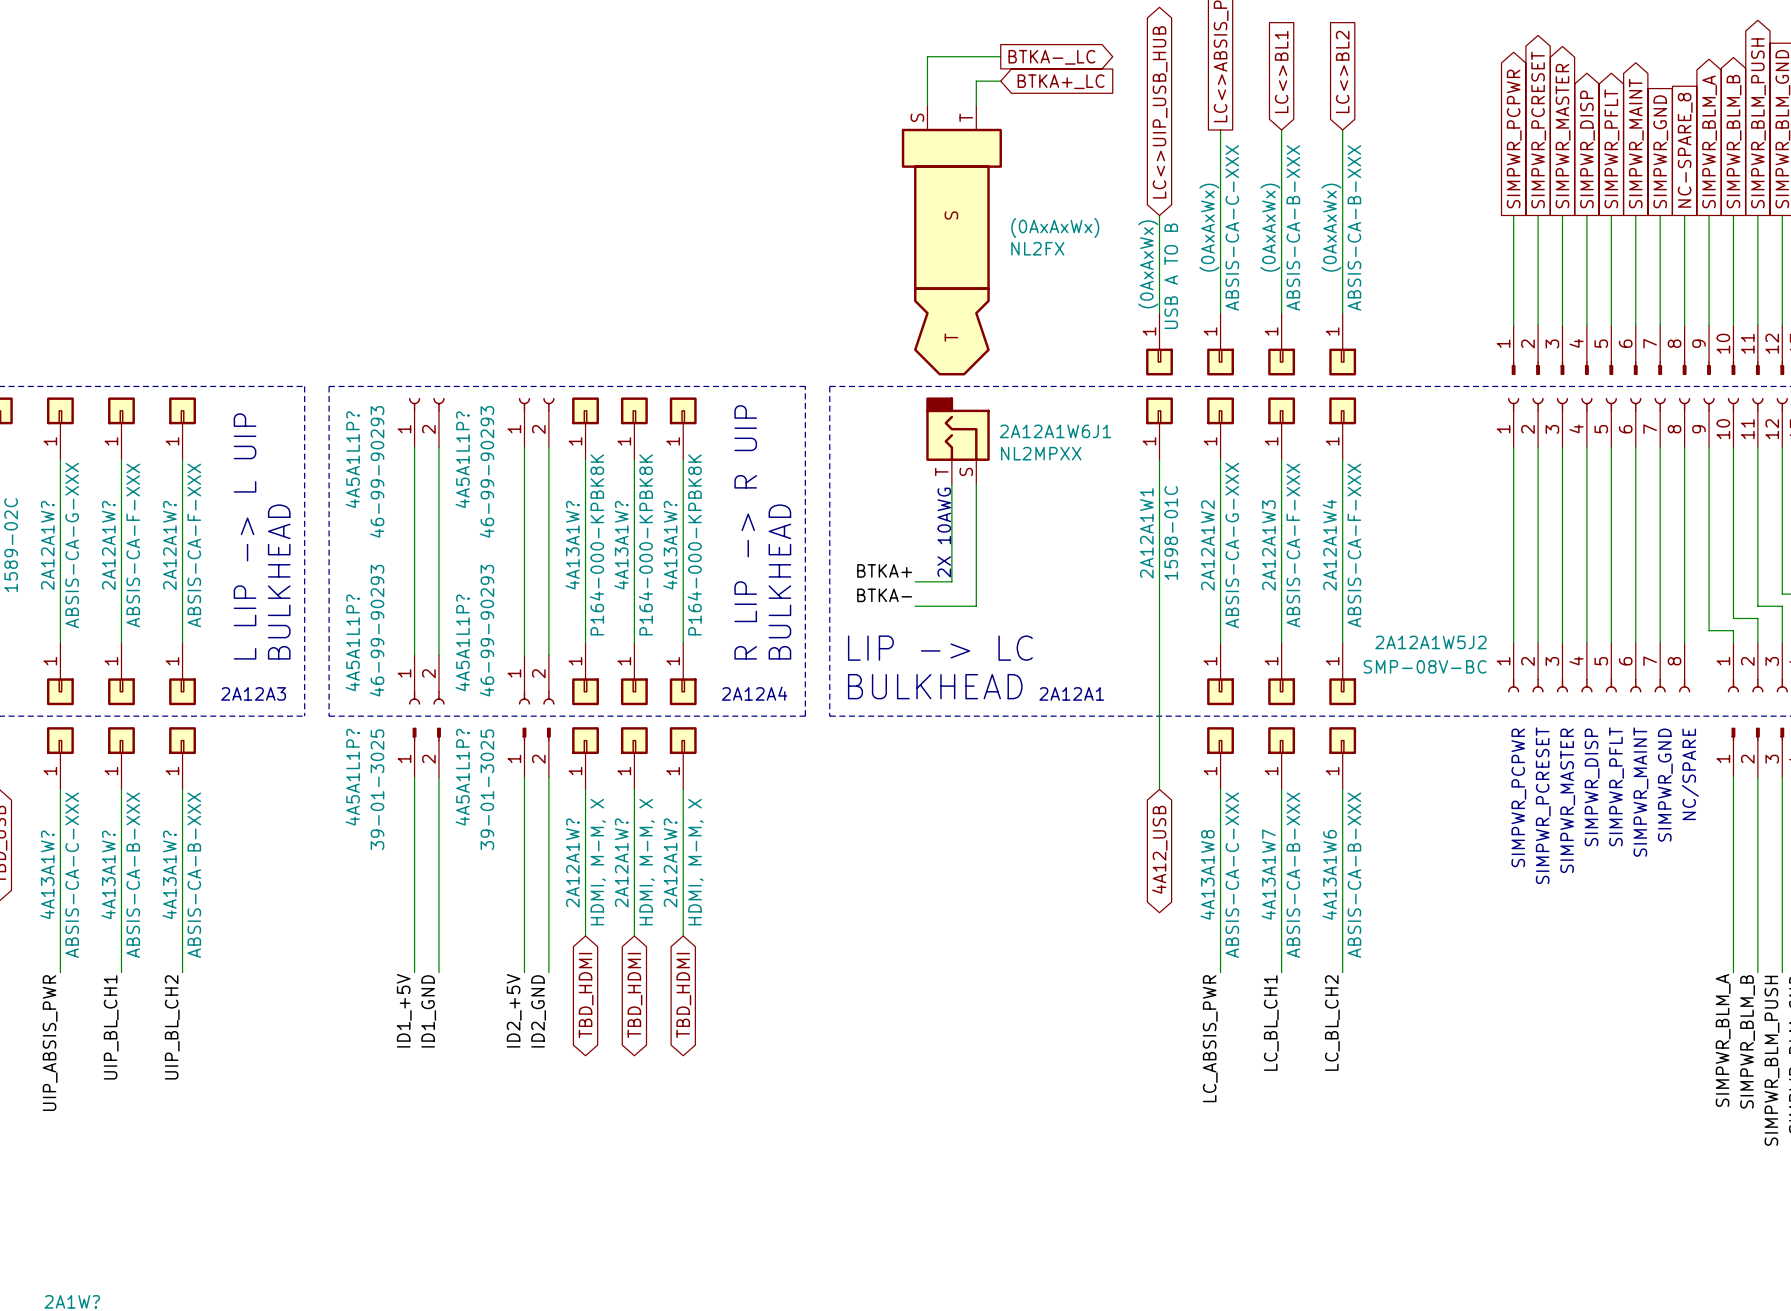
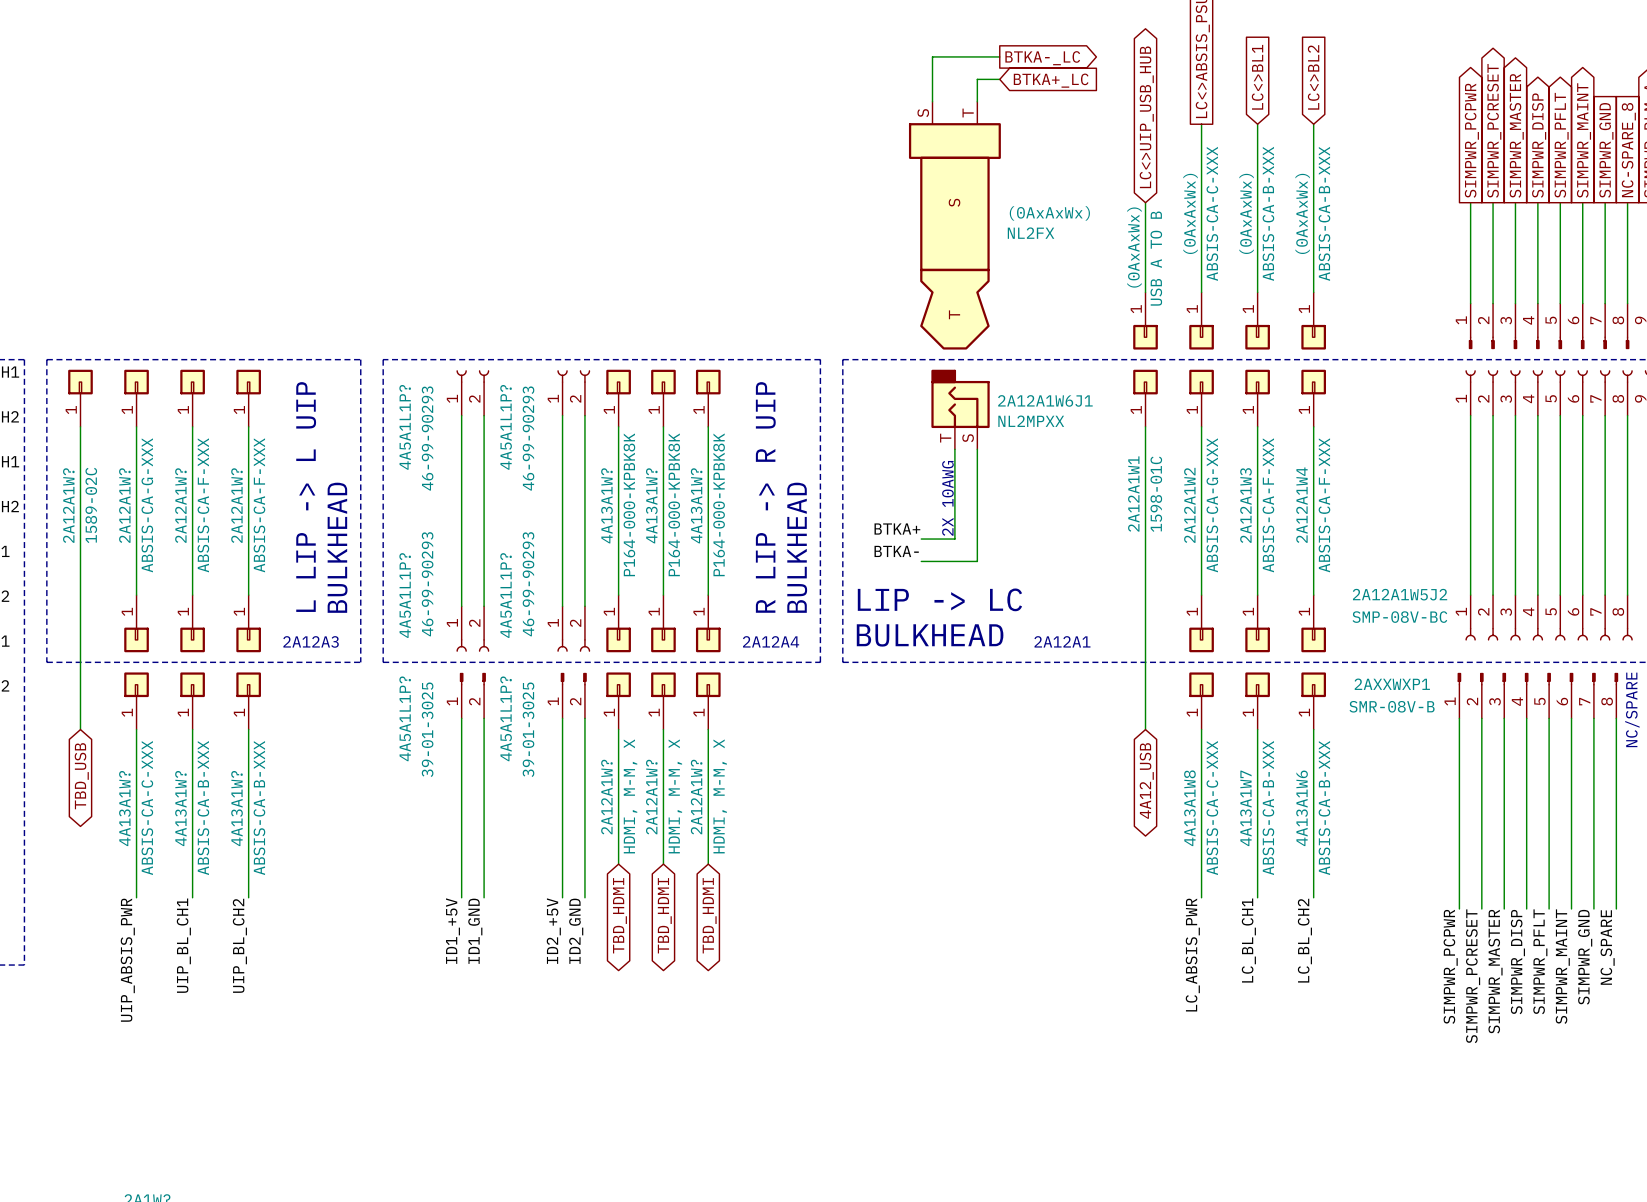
2AXXWXP1: none -> SMR-08V-B (1537, 695)
wire: none -> (1459, 718) (1459, 908)
wire: none -> (1481, 718) (1481, 908)
wire: none -> (1504, 718) (1504, 908)
wire: none -> (1526, 718) (1526, 908)
wire: none -> (1549, 718) (1549, 908)
wire: none -> (1571, 718) (1571, 908)
wire: none -> (1593, 718) (1593, 908)
wire: none -> (1616, 718) (1616, 908)
text: SIMPWR_GND (1665, 785) -> none
text: SIMPWR_PFLT (1616, 786) -> none
text: SIMPWR_DISP (1592, 787) -> none
text: SIMPWR_MAINT (1640, 792) -> none
text: SIMPWR_PCPWR (1518, 797) -> none
text: SIMPWR_MASTER (1567, 800) -> none
text: SIMPWR_PCRESET (1543, 805) -> none
label: none -> NC_SPARE (1607, 947)
label: none -> SIMPWR_GND (1585, 957)
label: none -> SIMPWR_PFLT (1540, 961)
label: none -> SIMPWR_DISP (1517, 962)
label: none -> SIMPWR_MAINT (1562, 966)
label: none -> SIMPWR_PCPWR (1450, 966)
label: none -> SIMPWR_MASTER (1495, 971)
label: none -> SIMPWR_PCRESET (1473, 976)

